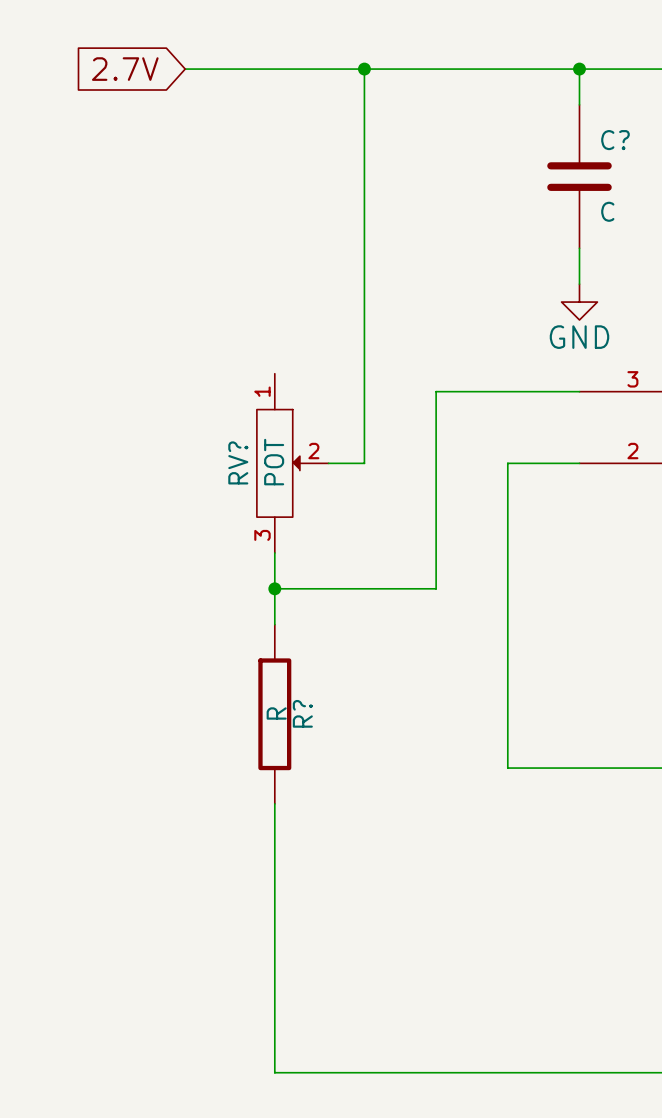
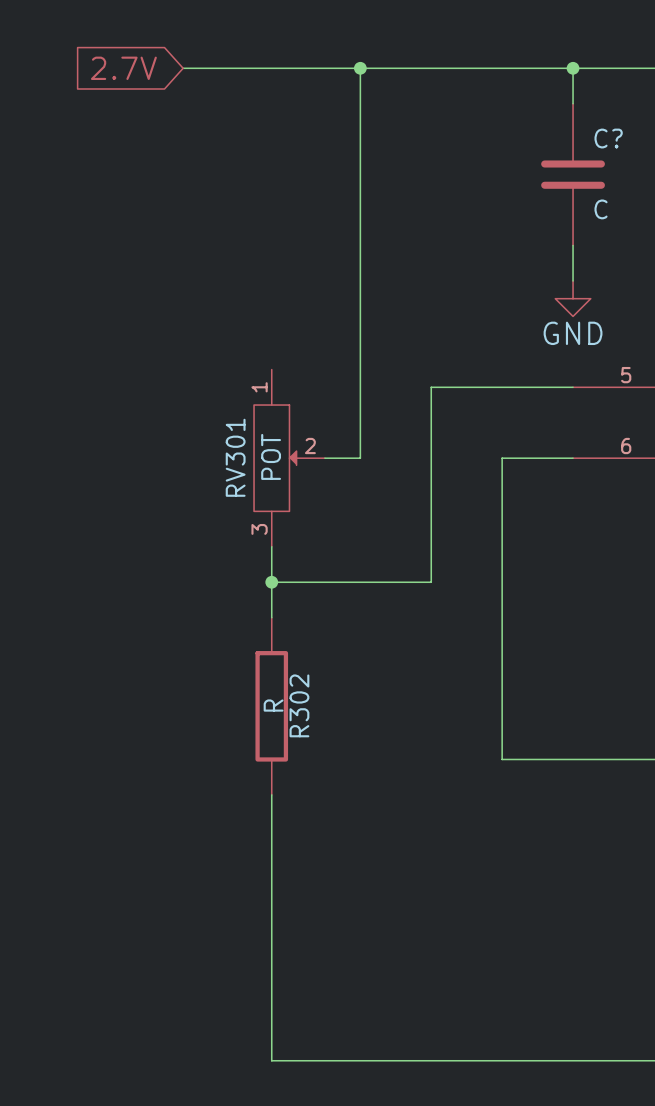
part pin number: 3 (632, 379) -> 5 (626, 375)
part pin number: 2 (632, 451) -> 6 (626, 446)
RV? name: RV? (238, 462) -> RV301 (235, 457)
R? name: R? (302, 713) -> R302 (299, 705)

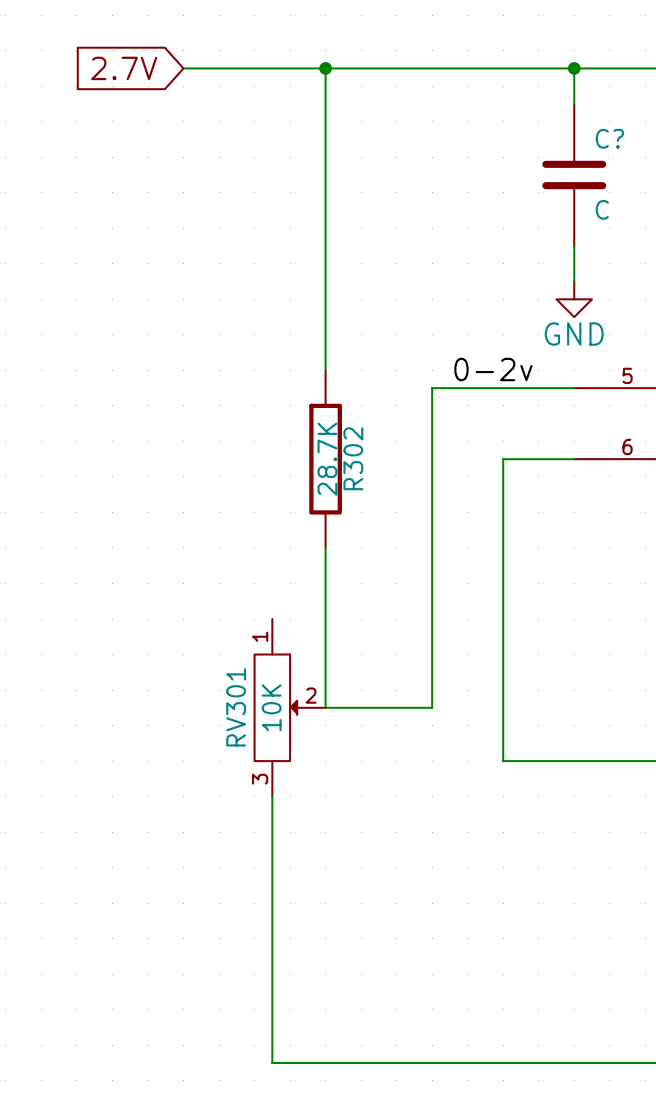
wire: none -> (325, 68) (325, 370)
wire: (360, 68) (360, 458) (324, 458) -> none
junction position: (360, 68) -> (325, 68)
label: none -> 0-2v (493, 369)
RV301 value: POT (271, 456) -> 10K (271, 707)
RV301 position: (289, 458) -> (290, 707)
wire: (271, 546) (271, 617) -> none
wire: (271, 582) (431, 582) -> (325, 547) (325, 707) (432, 707) (432, 583)
junction: (271, 582) -> none
R302 value: R (273, 705) -> 28.7K (327, 459)
R302 position: (271, 706) -> (325, 459)

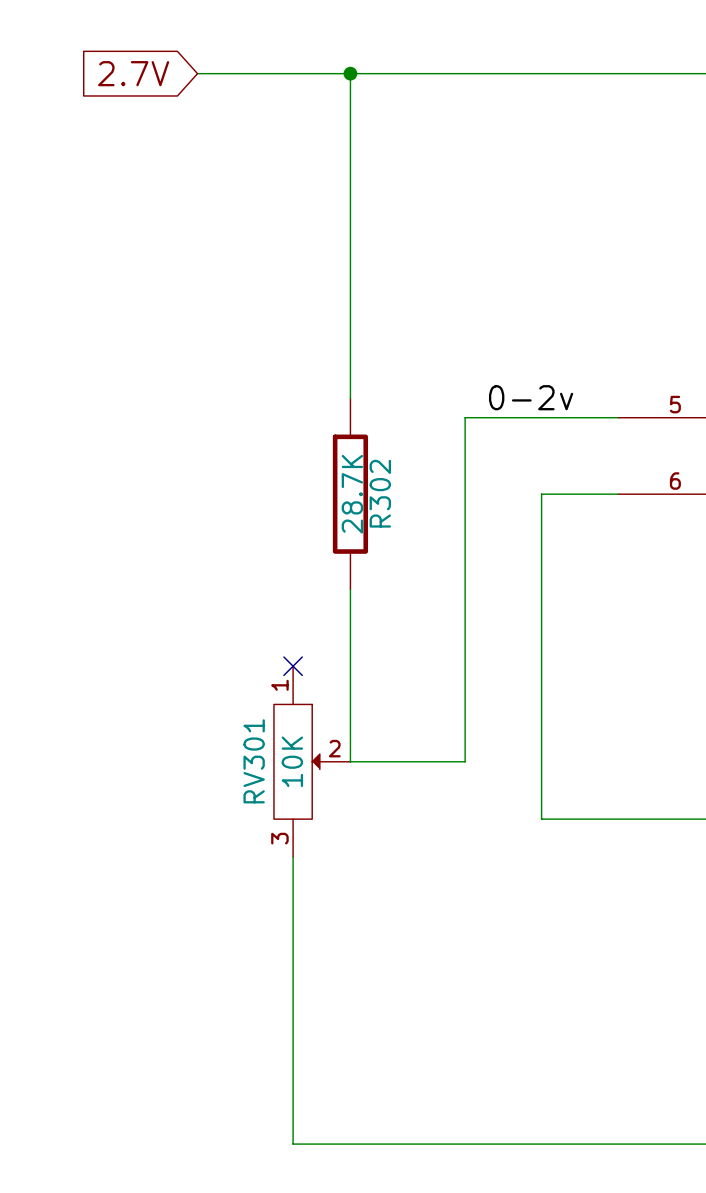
wire: (574, 68) (574, 103) -> none
junction: (574, 68) -> none
C?: C (574, 175) -> none
wire: (574, 246) (574, 281) -> none
power symbol: GND (574, 299) -> none
no-connect mark: none -> (293, 666)

